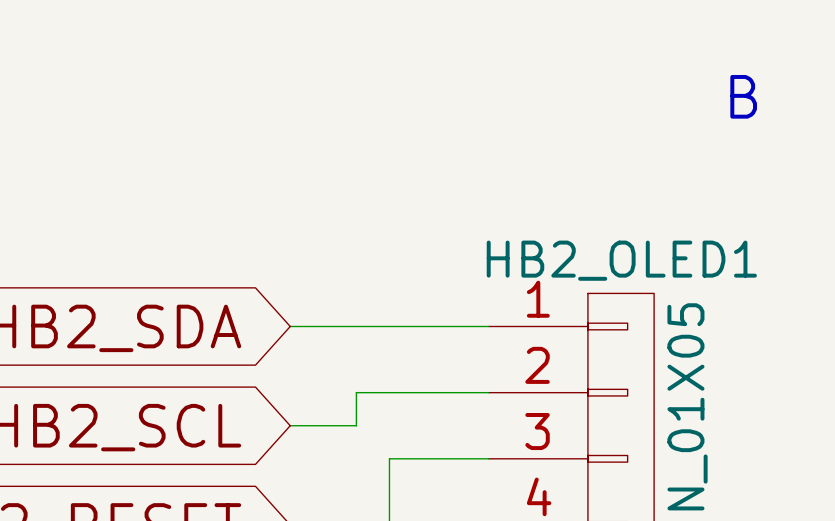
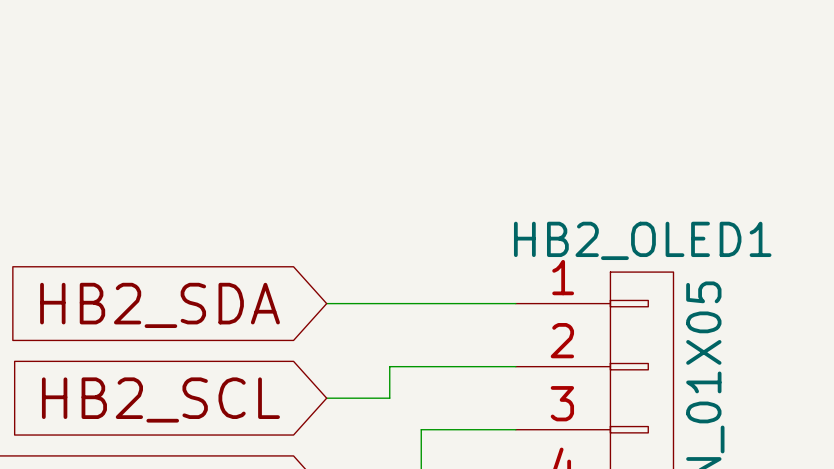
text: B (743, 96) -> none

